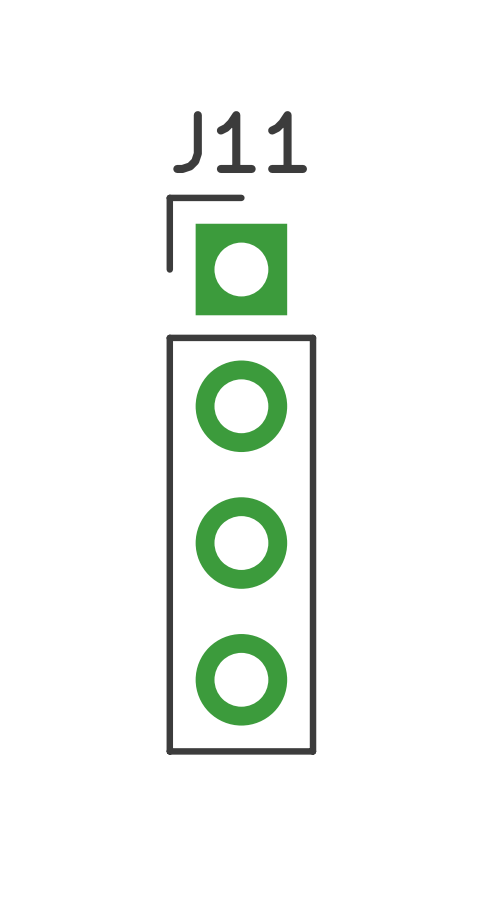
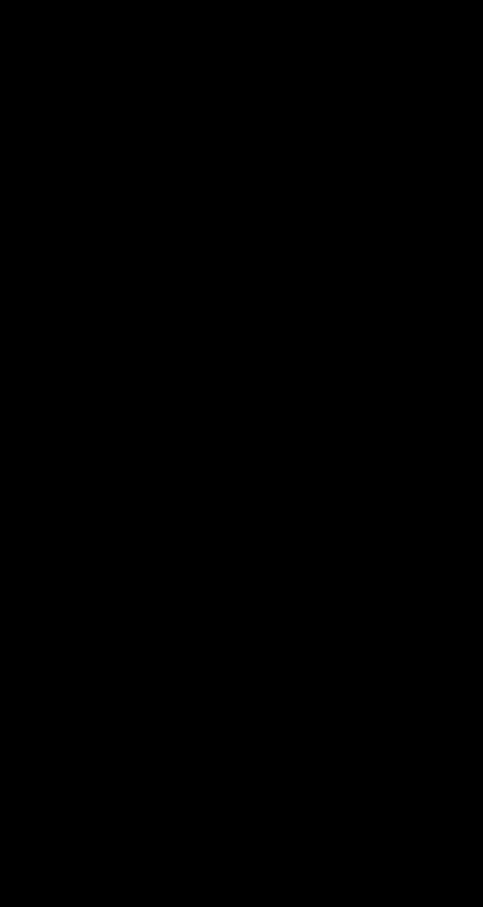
J11: (241, 474) -> none

